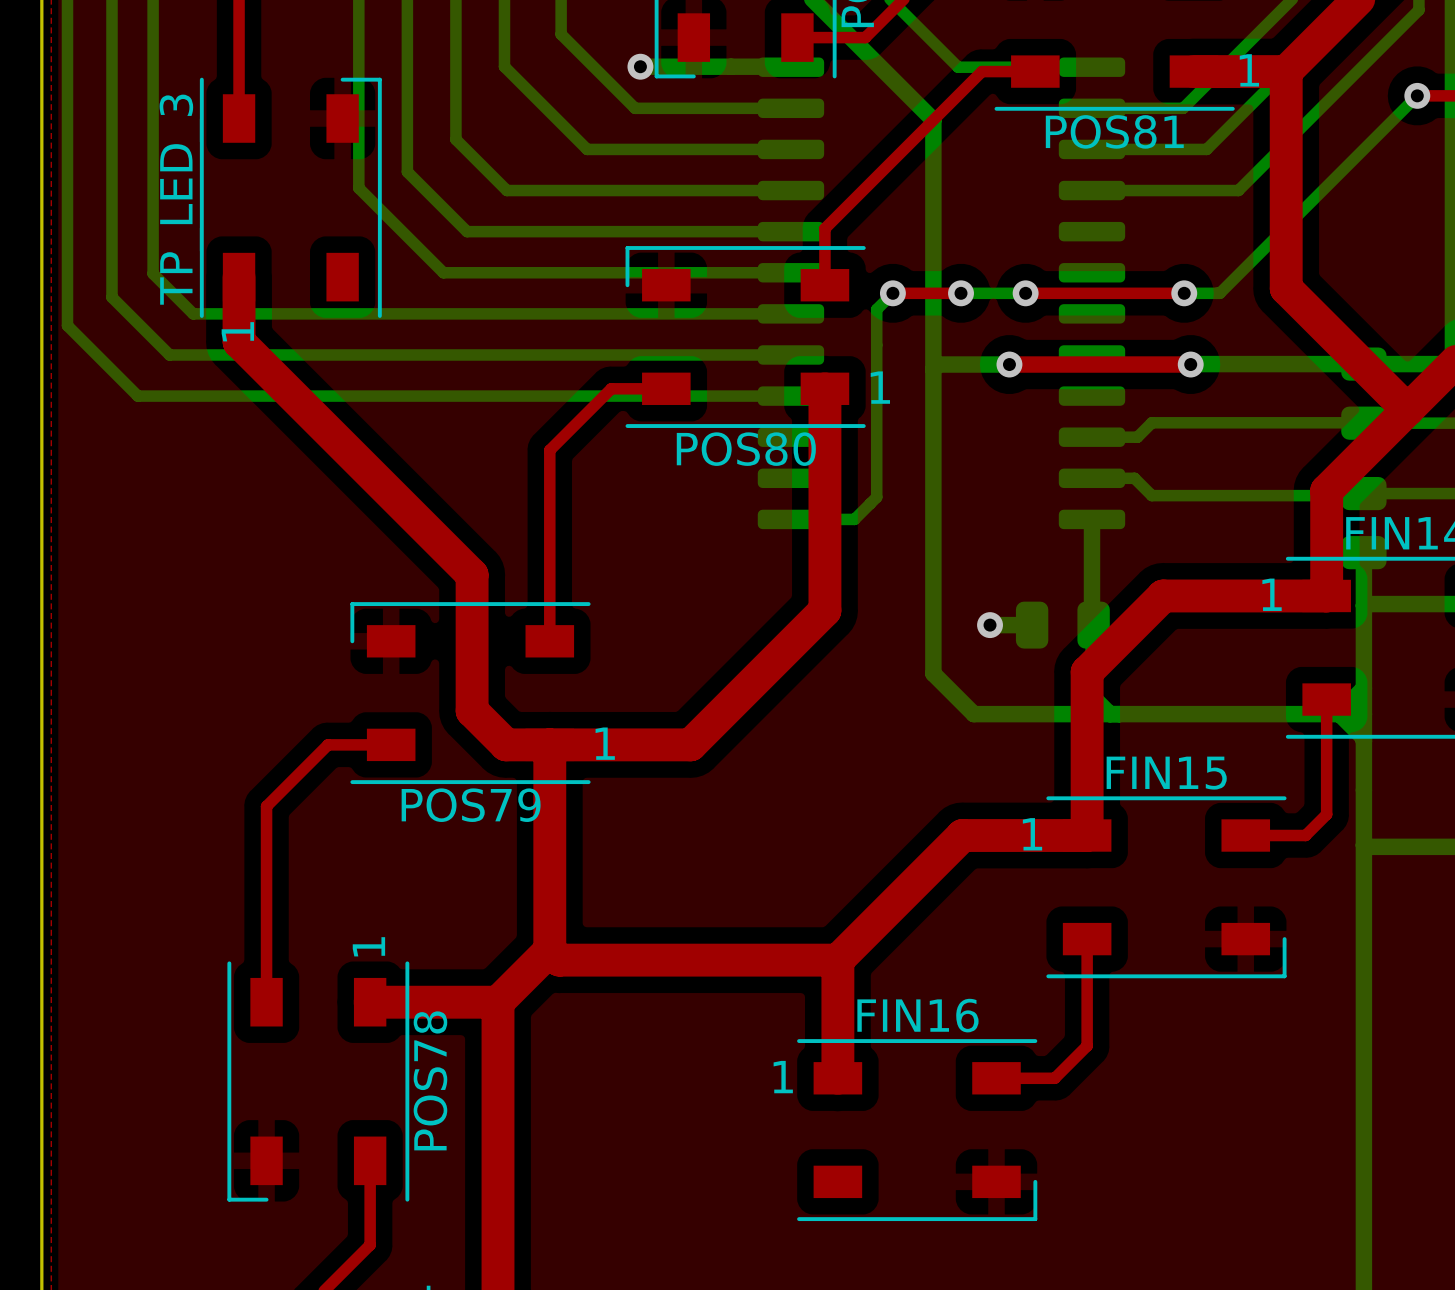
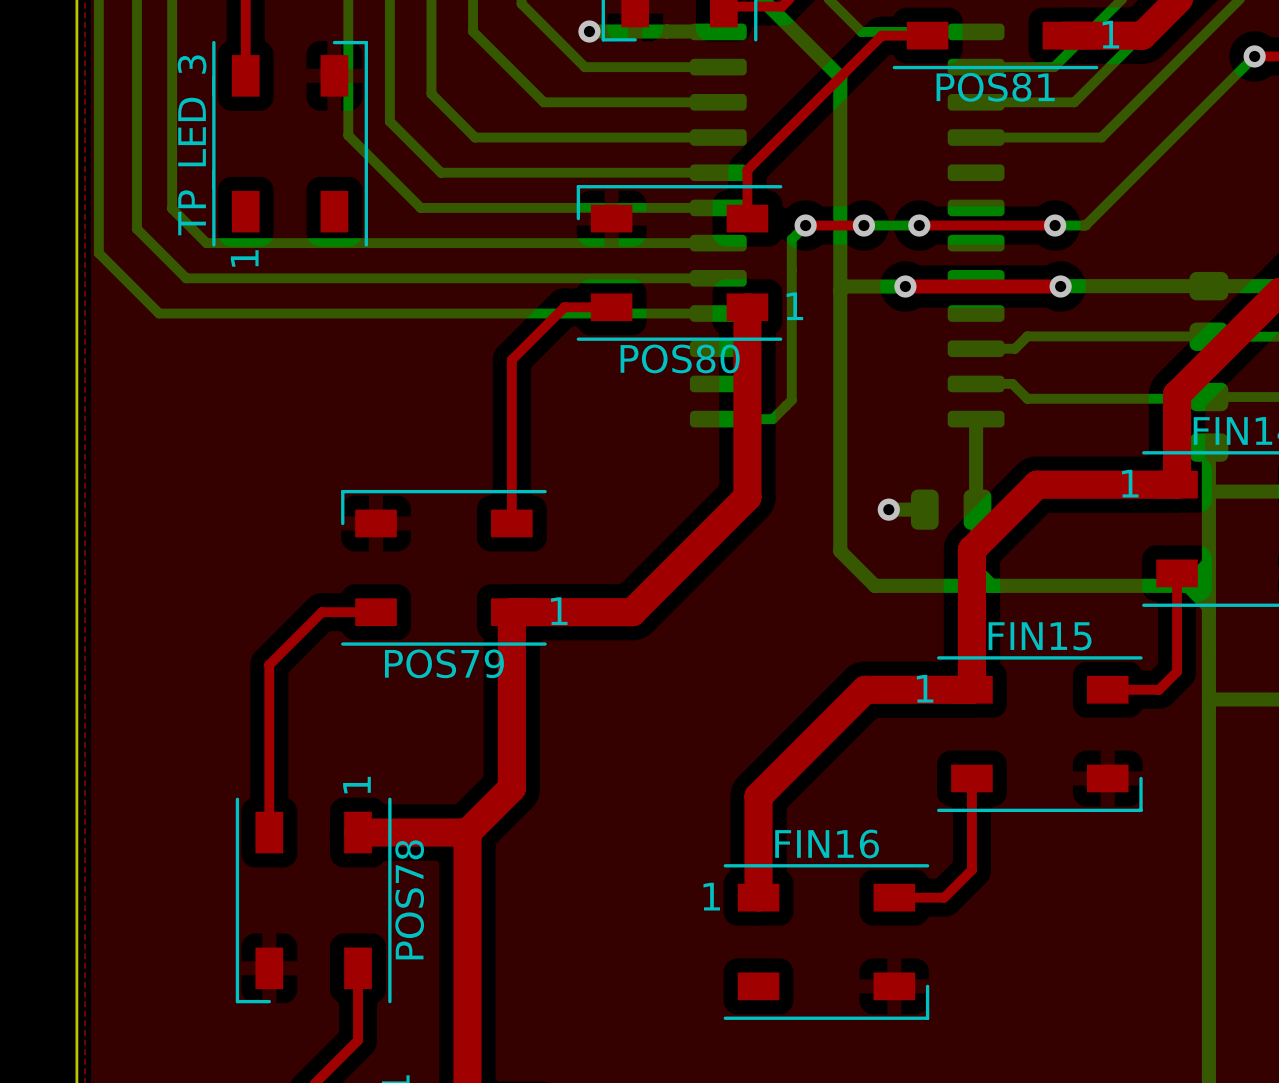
top track: (1286, 71) (1286, 288) (1407, 409) -> none
top track: (239, 277) (239, 341) (472, 574) (472, 710) (506, 744) (549, 744) -> none
top track: (549, 950) (559, 960) (837, 960) -> none

